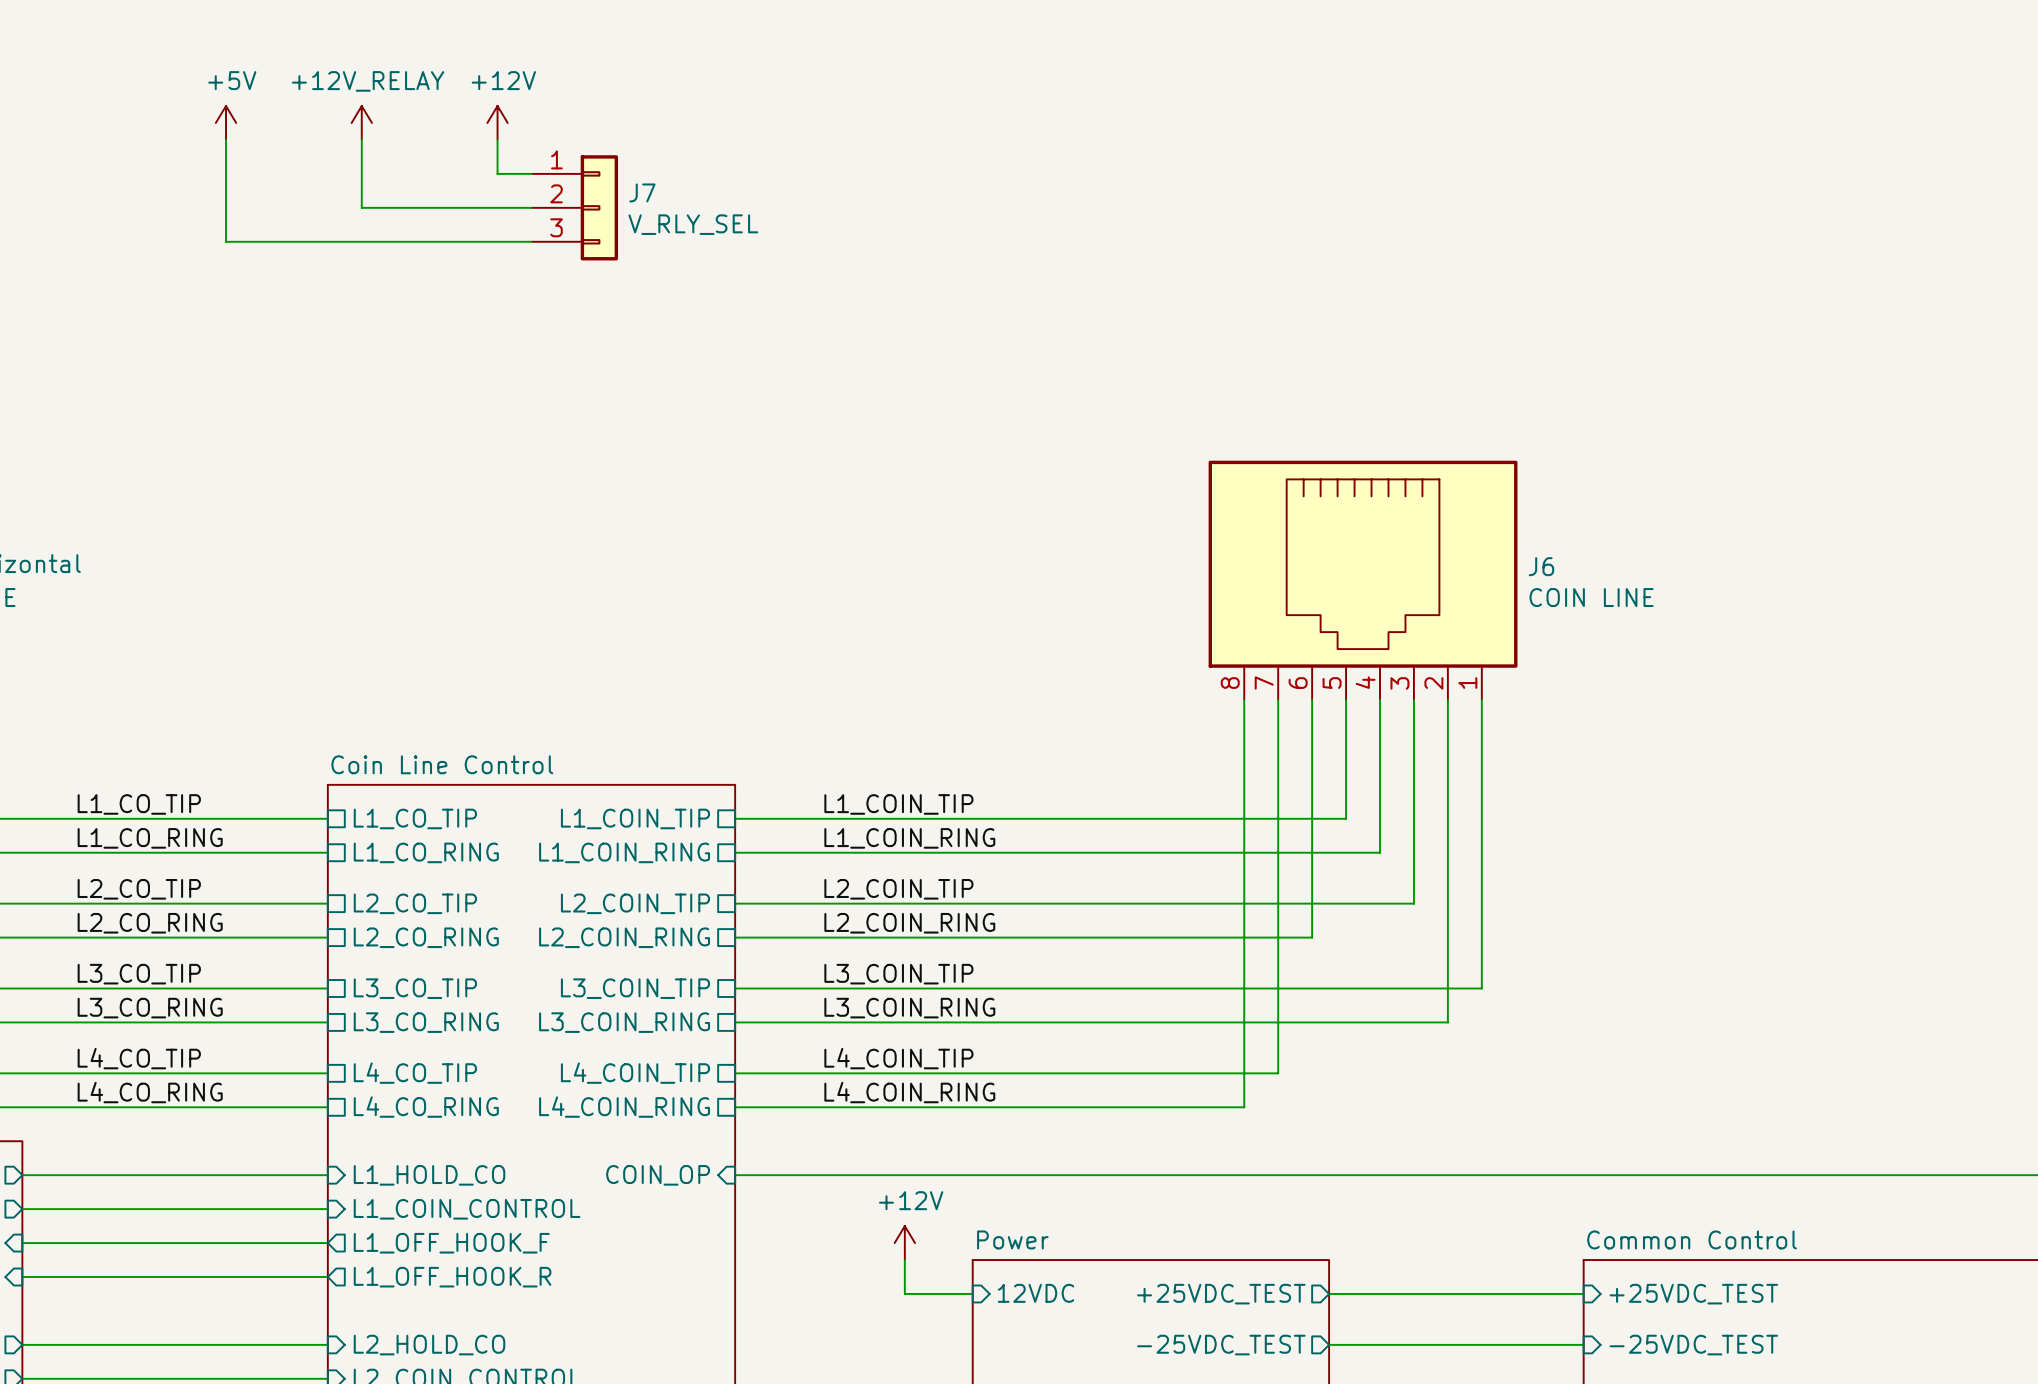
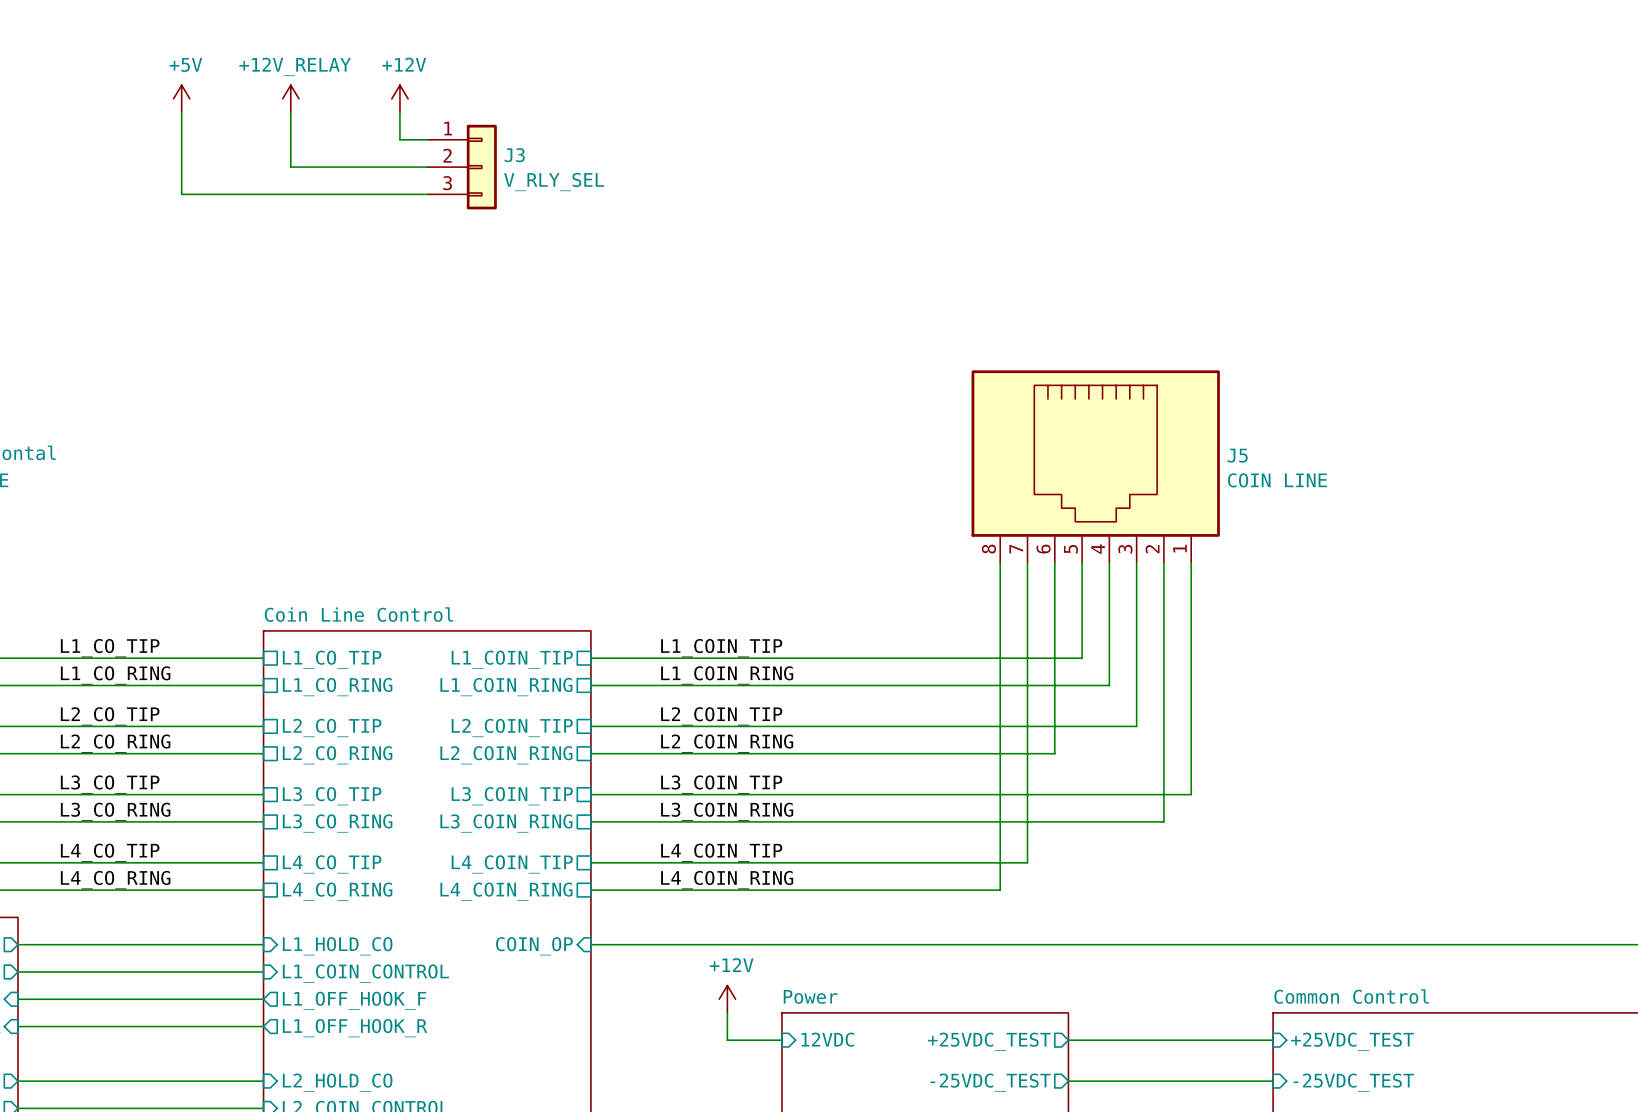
J7 name: J7 (642, 192) -> J3 (514, 155)
J6 name: J6 (1541, 566) -> J5 (1237, 455)

